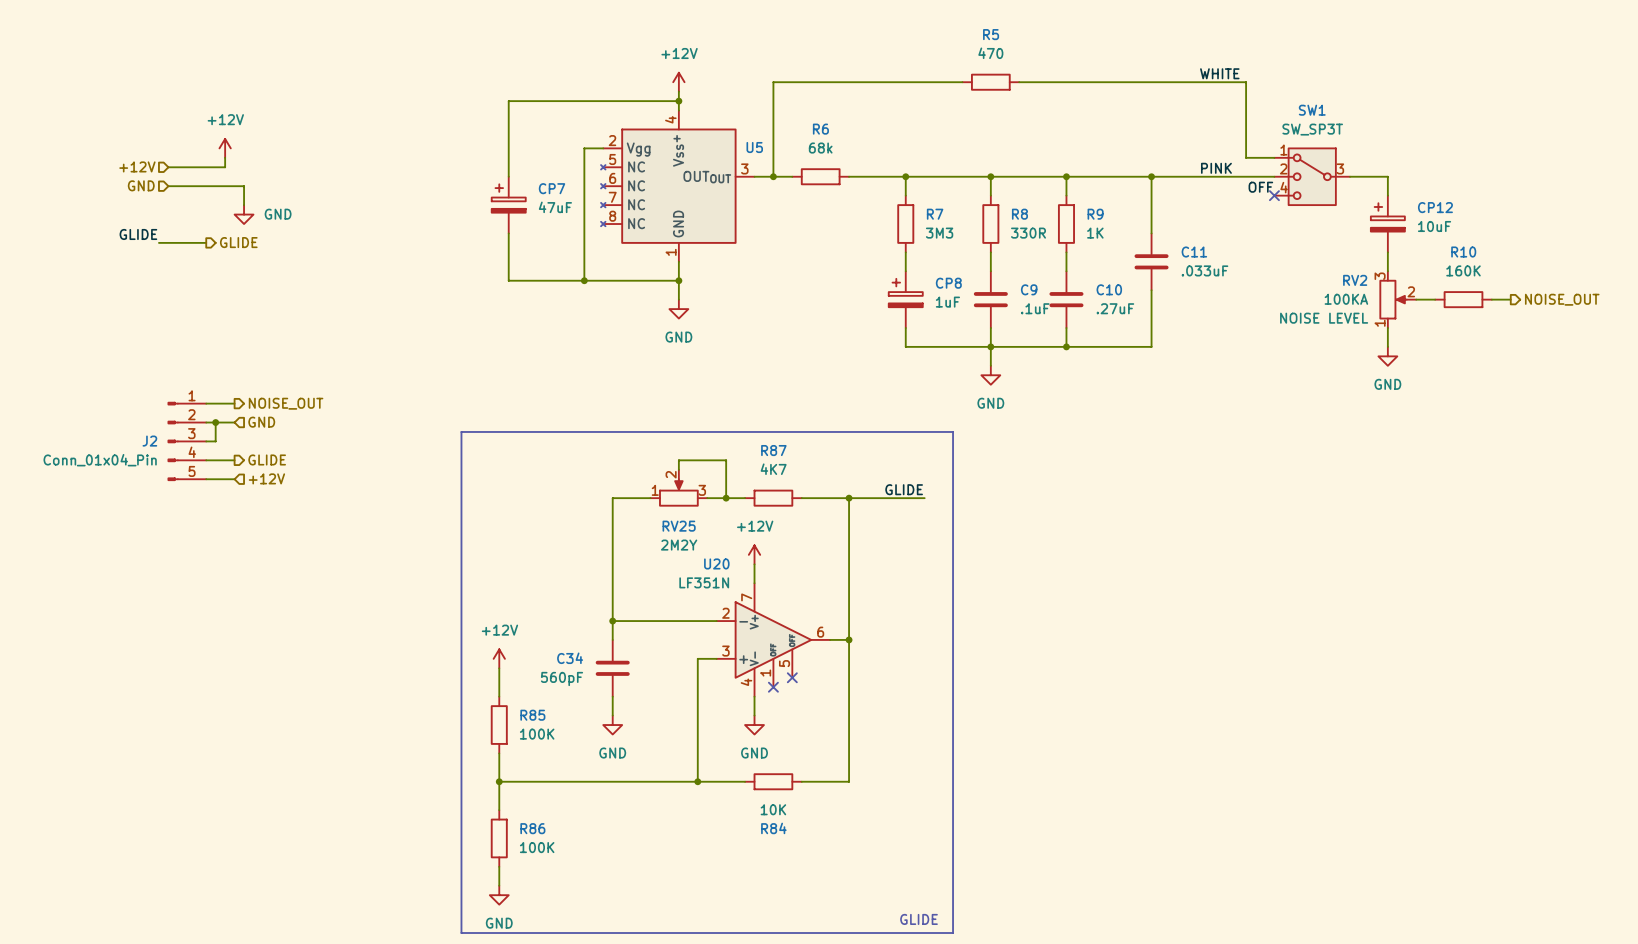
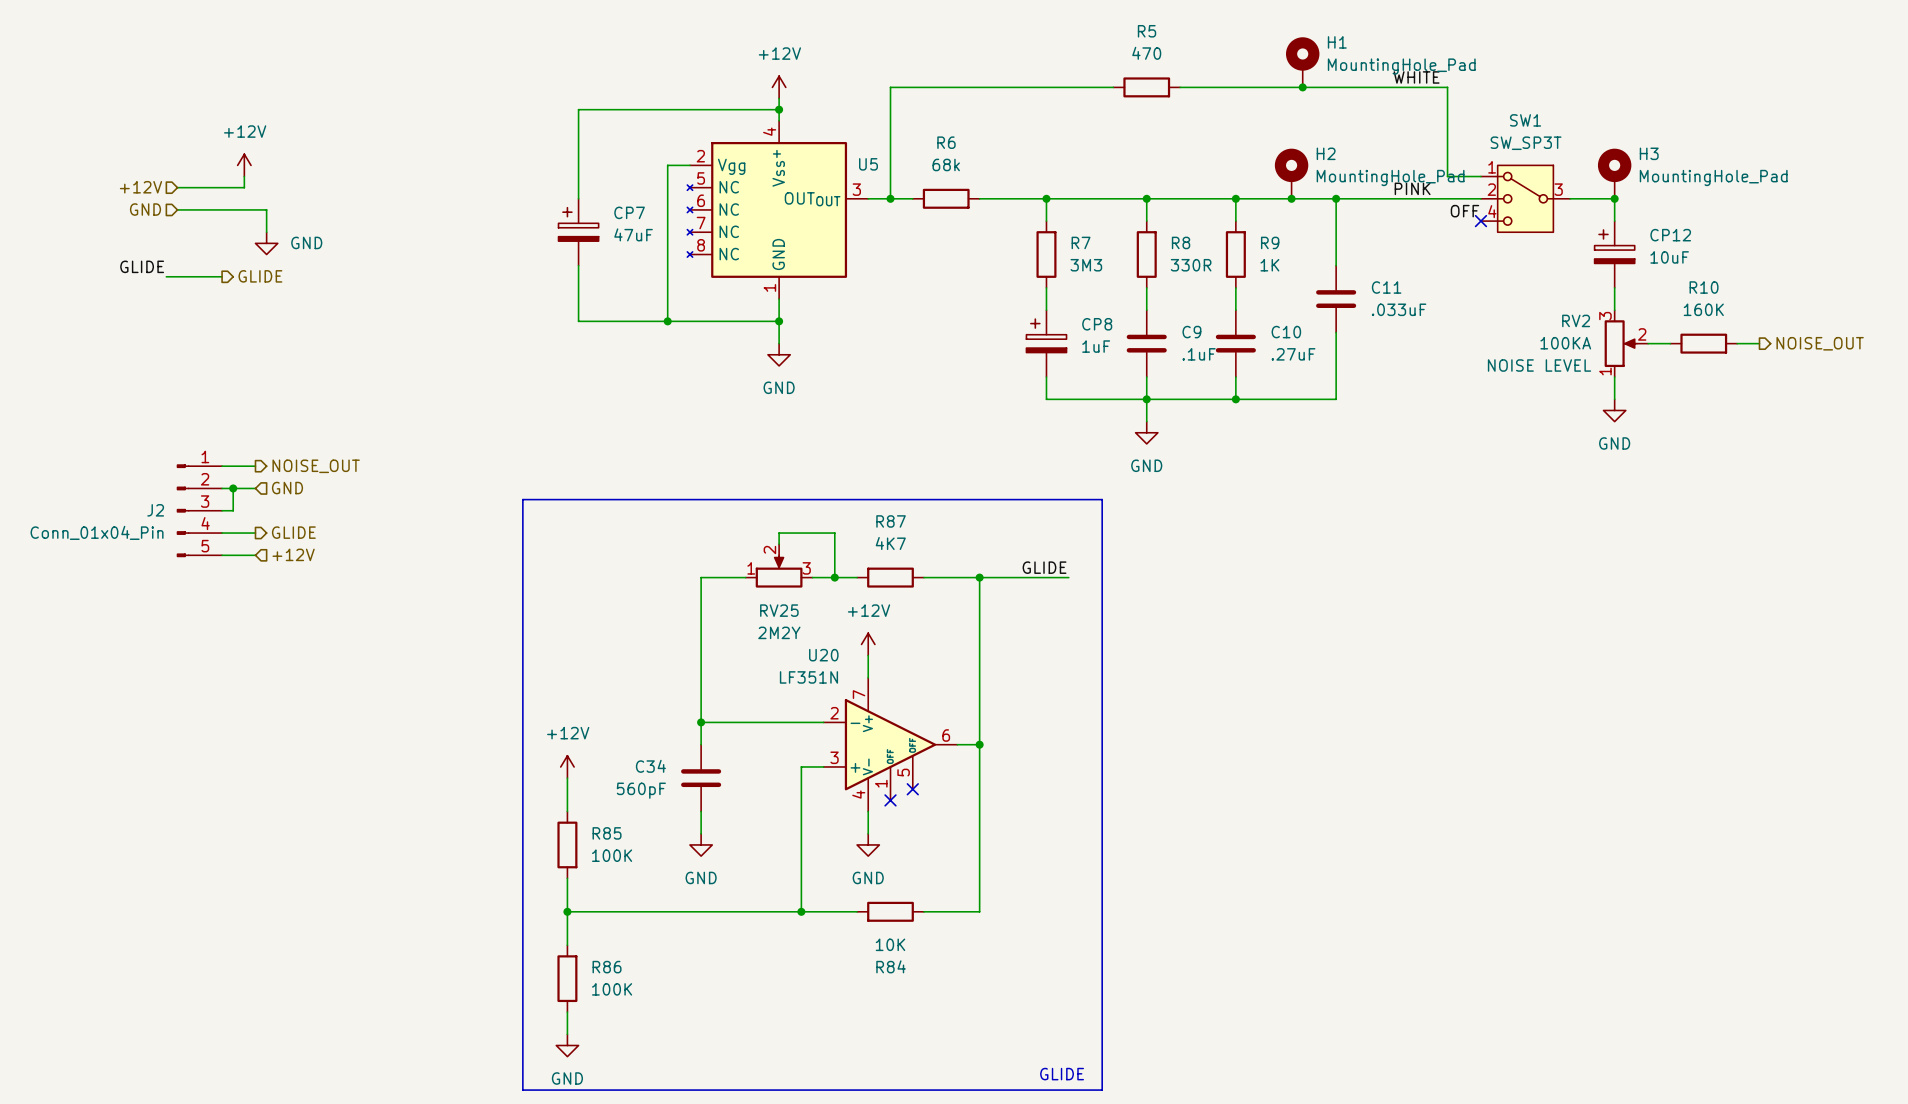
H1: none -> MountingHole_Pad (1302, 62)
junction: none -> (1302, 87)
H2: none -> MountingHole_Pad (1291, 173)
H3: none -> MountingHole_Pad (1614, 173)
junction: none -> (1291, 198)
junction: none -> (1614, 198)

